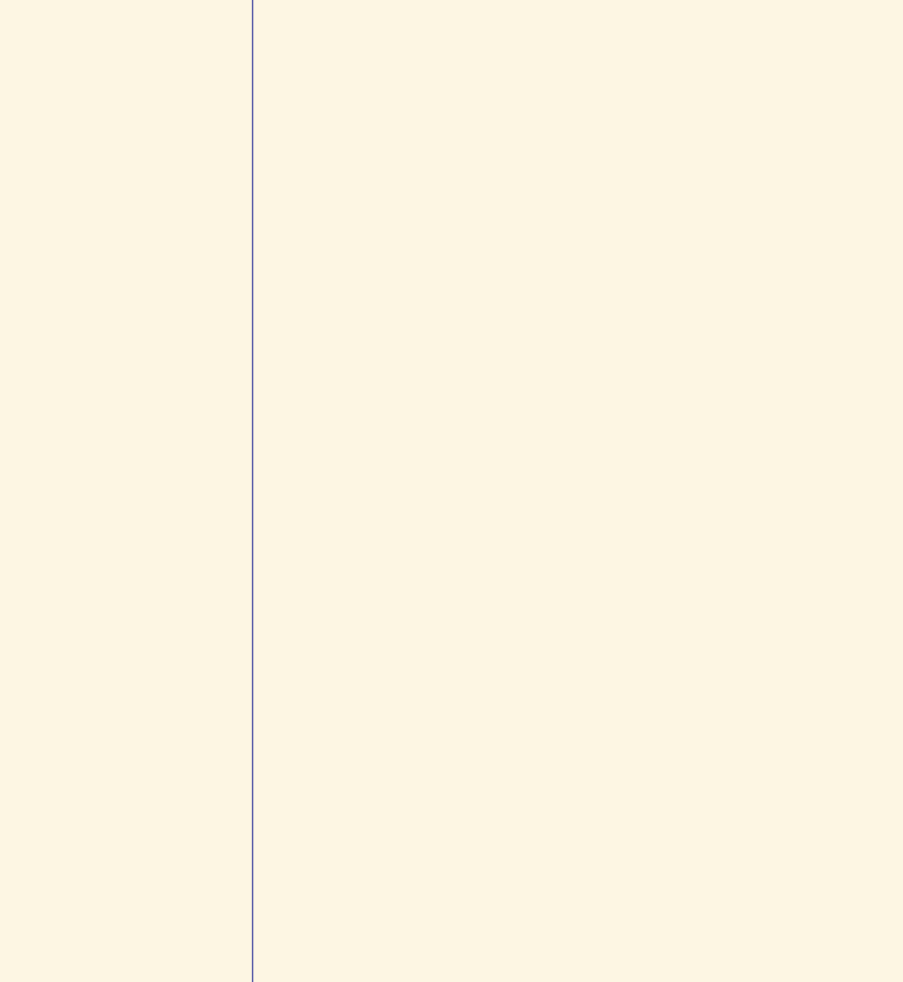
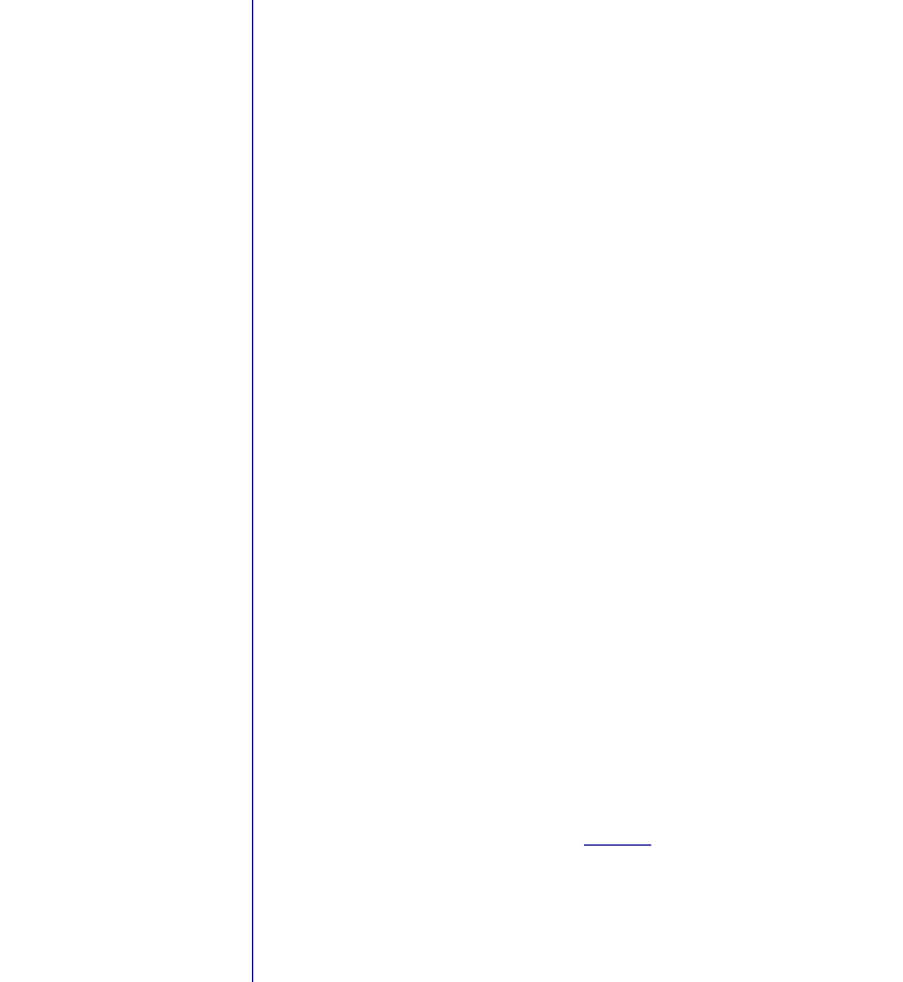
line: none -> (584, 845) (650, 845)

